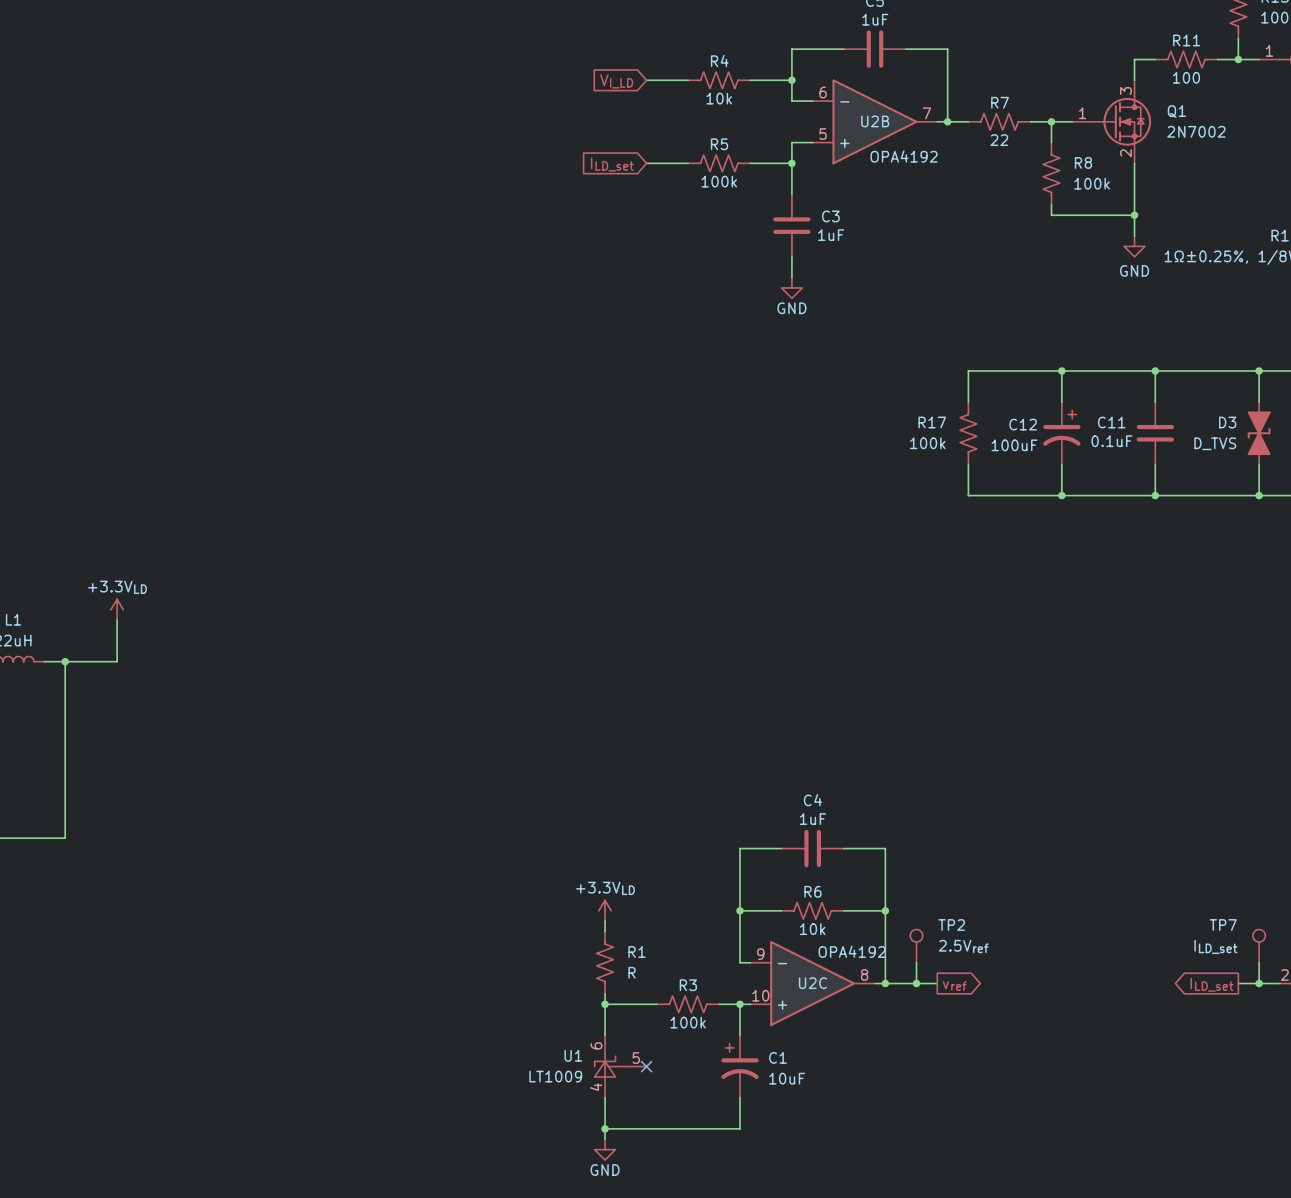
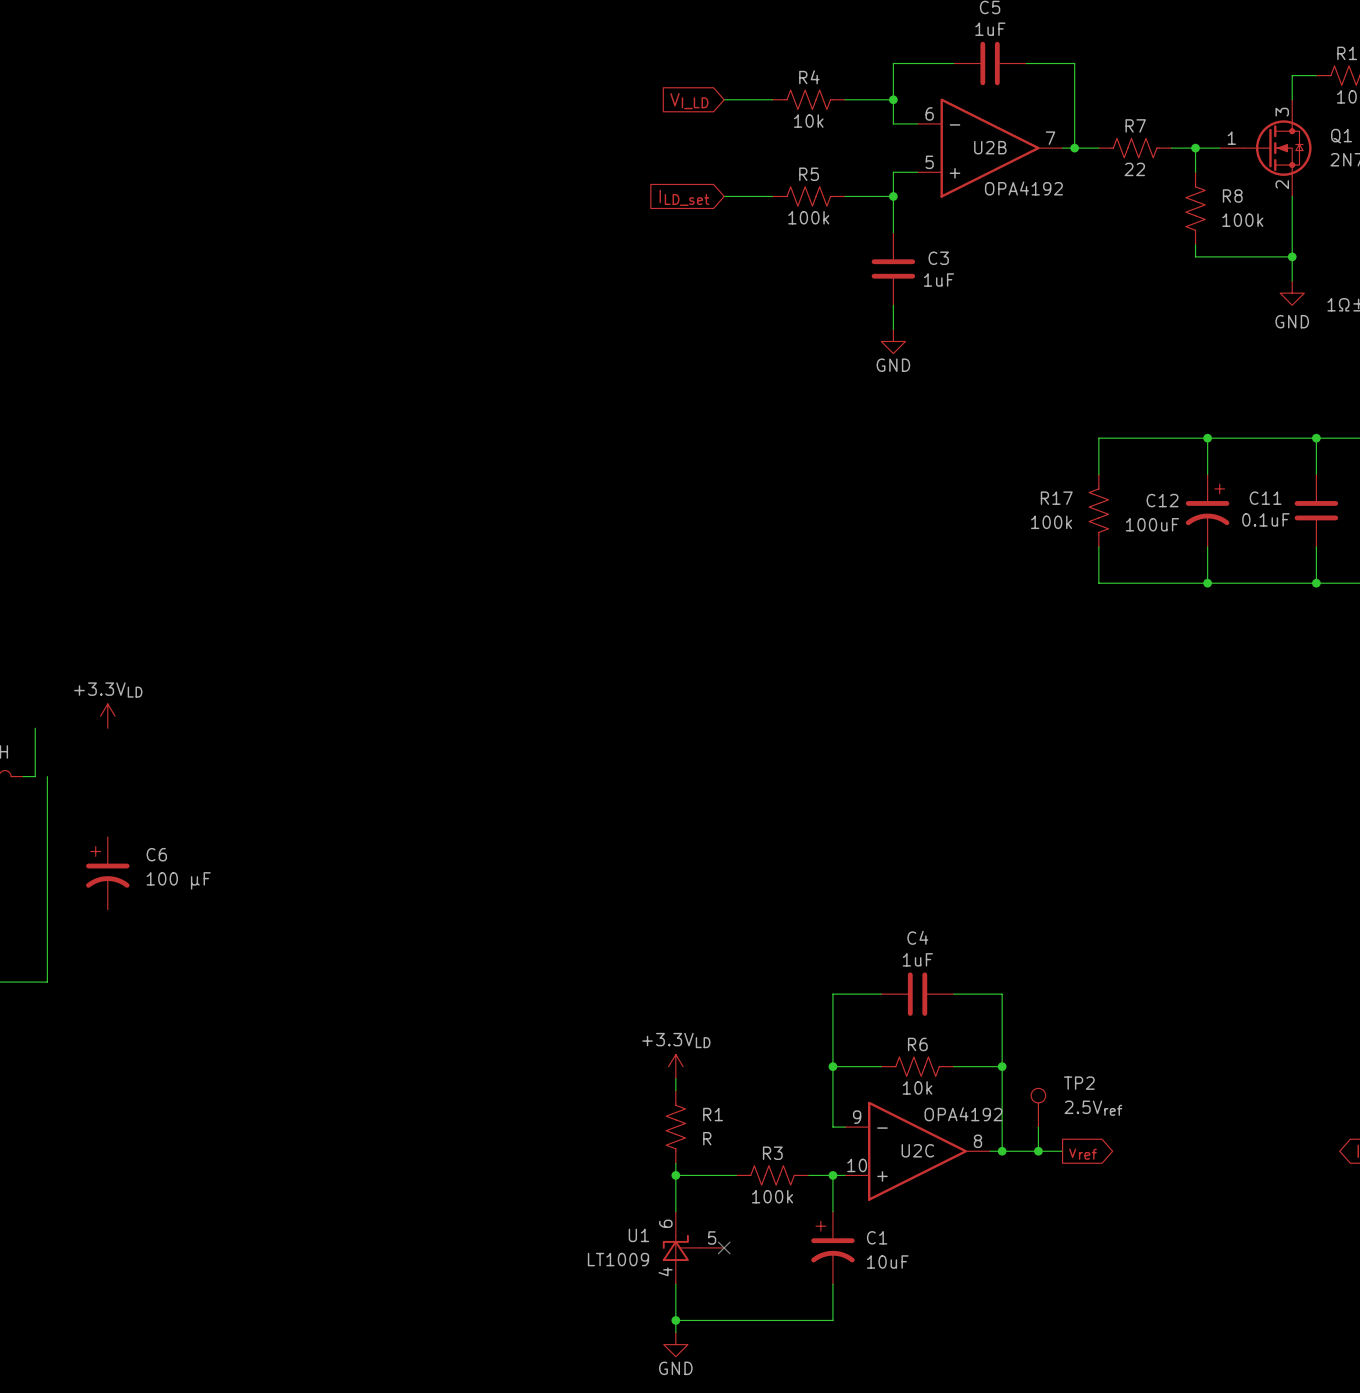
wire: (117, 620) (117, 661) (54, 661) -> (35, 728) (35, 776)
junction: (65, 661) -> none
C6: none -> 100 µF (107, 873)

